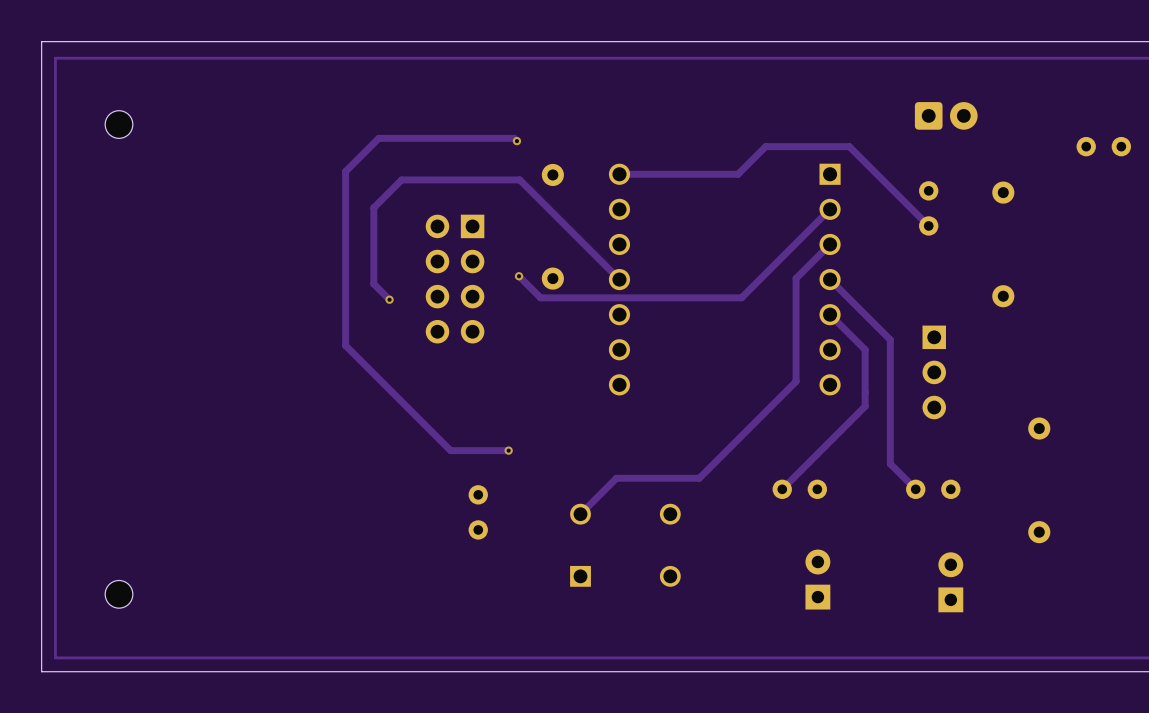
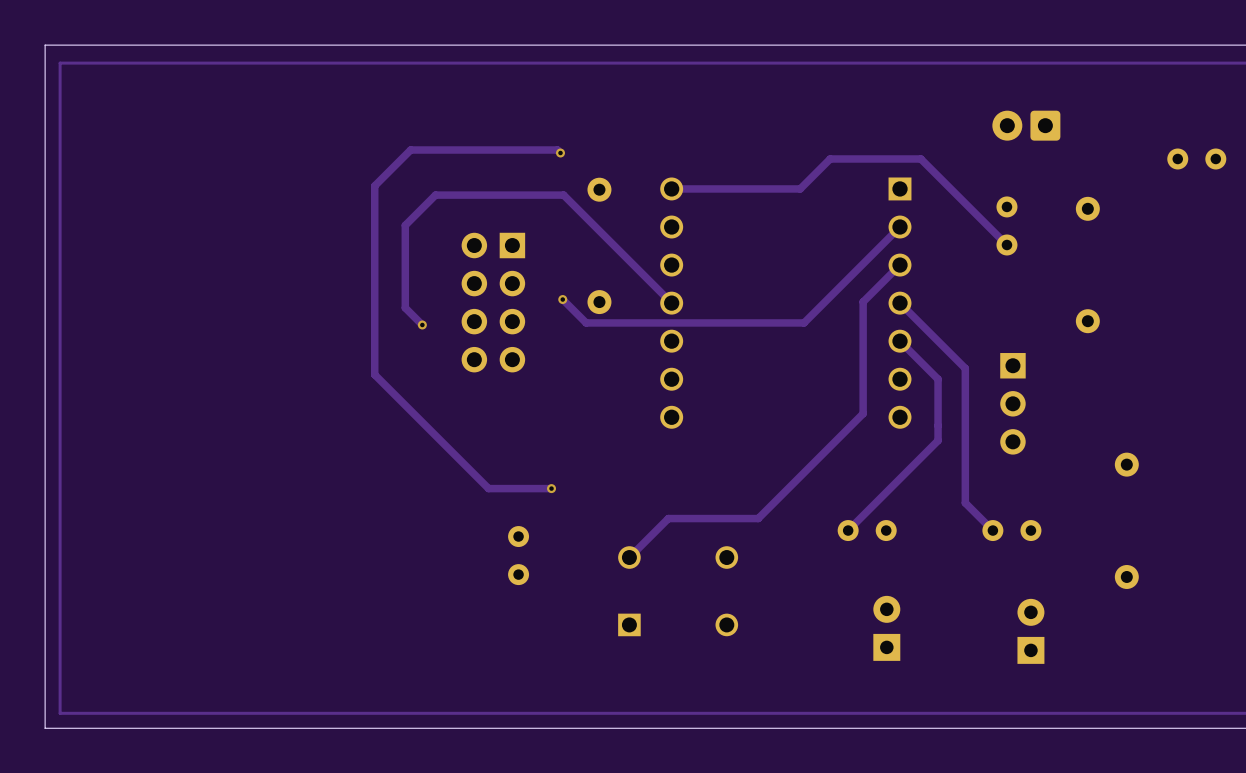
part rotation: 0° (946, 115) -> 180° (1026, 125)
part: (119, 124) -> none
part: (119, 594) -> none

